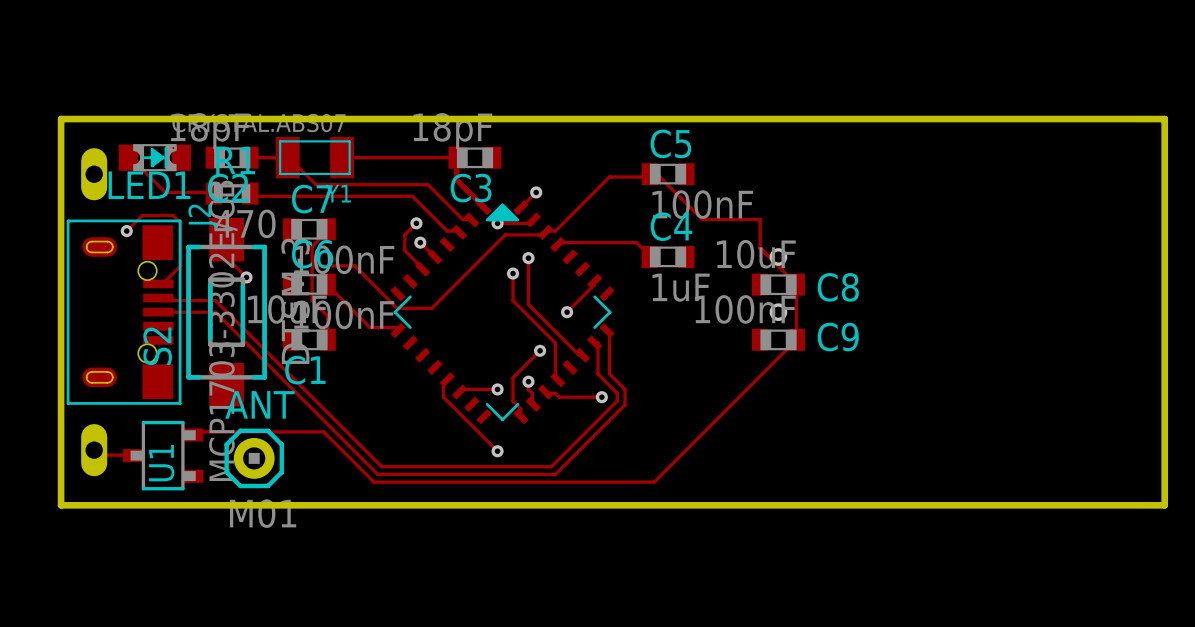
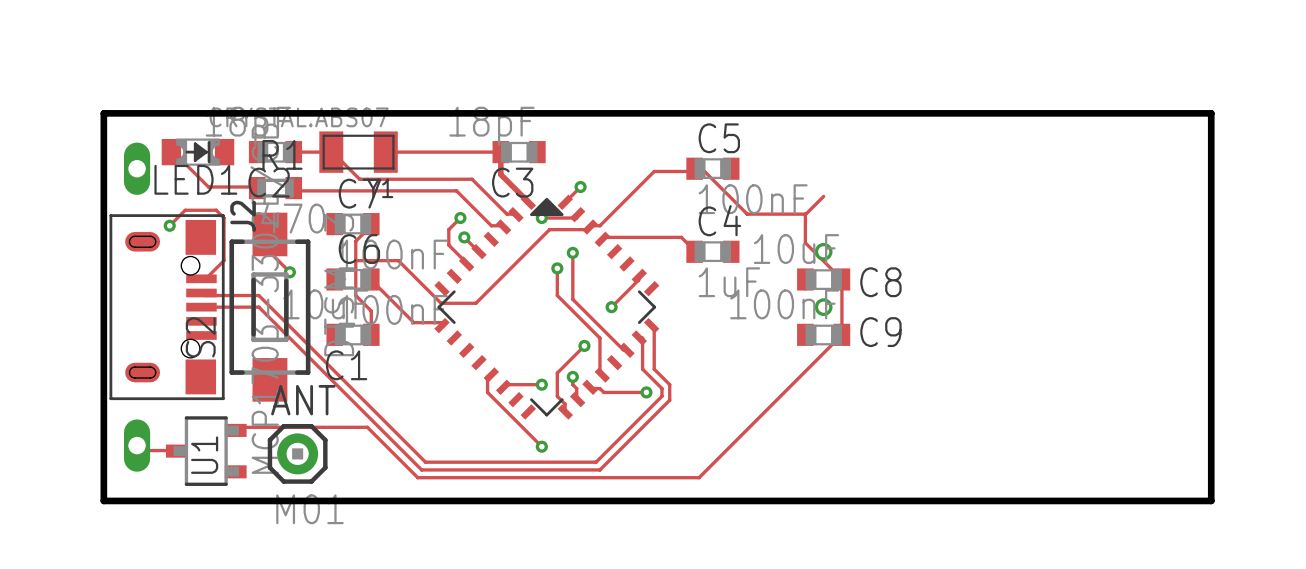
track: none -> (823, 196) (805, 214)

